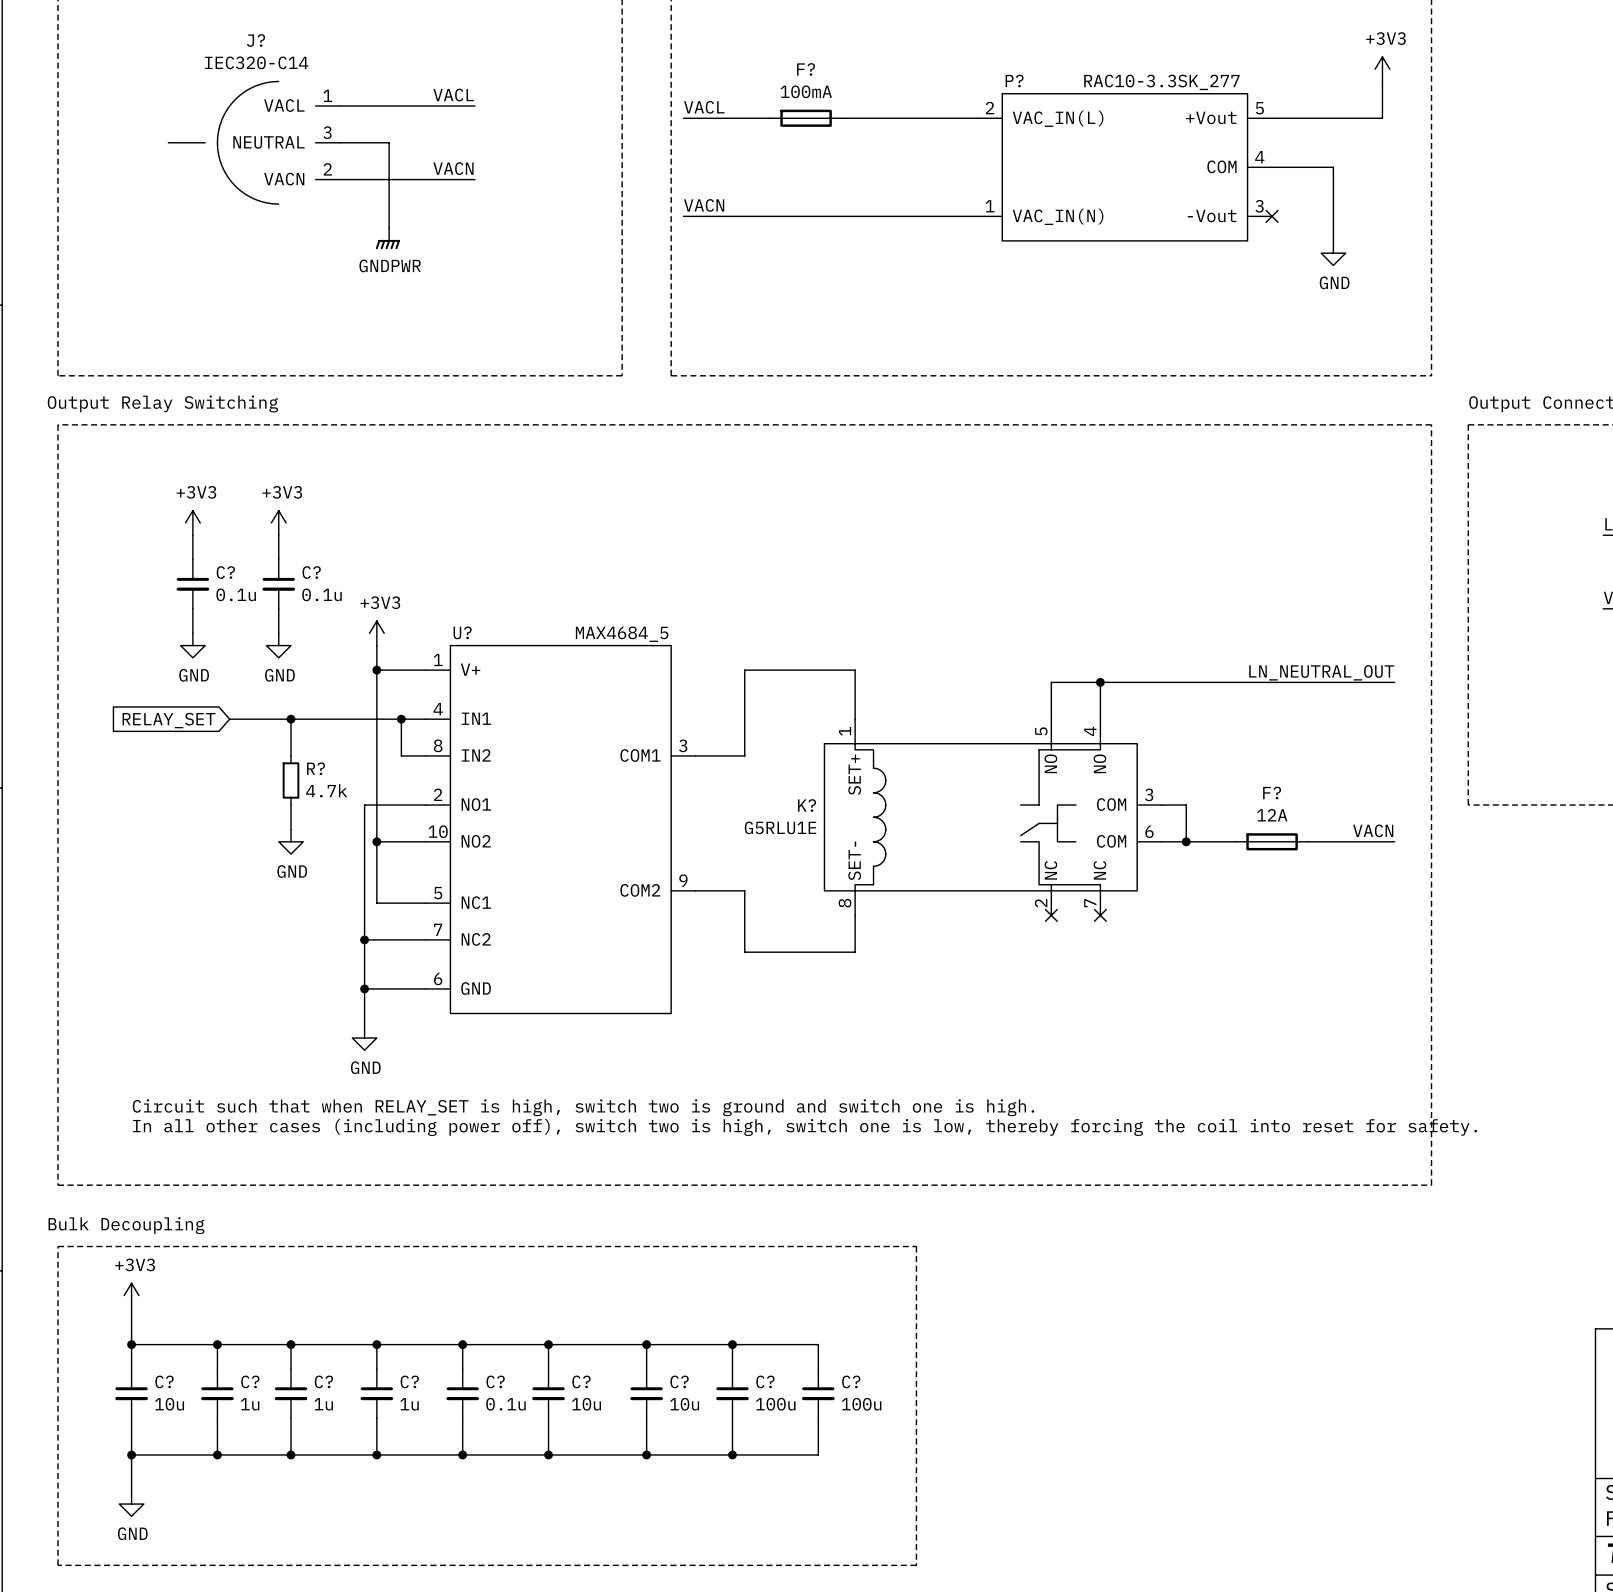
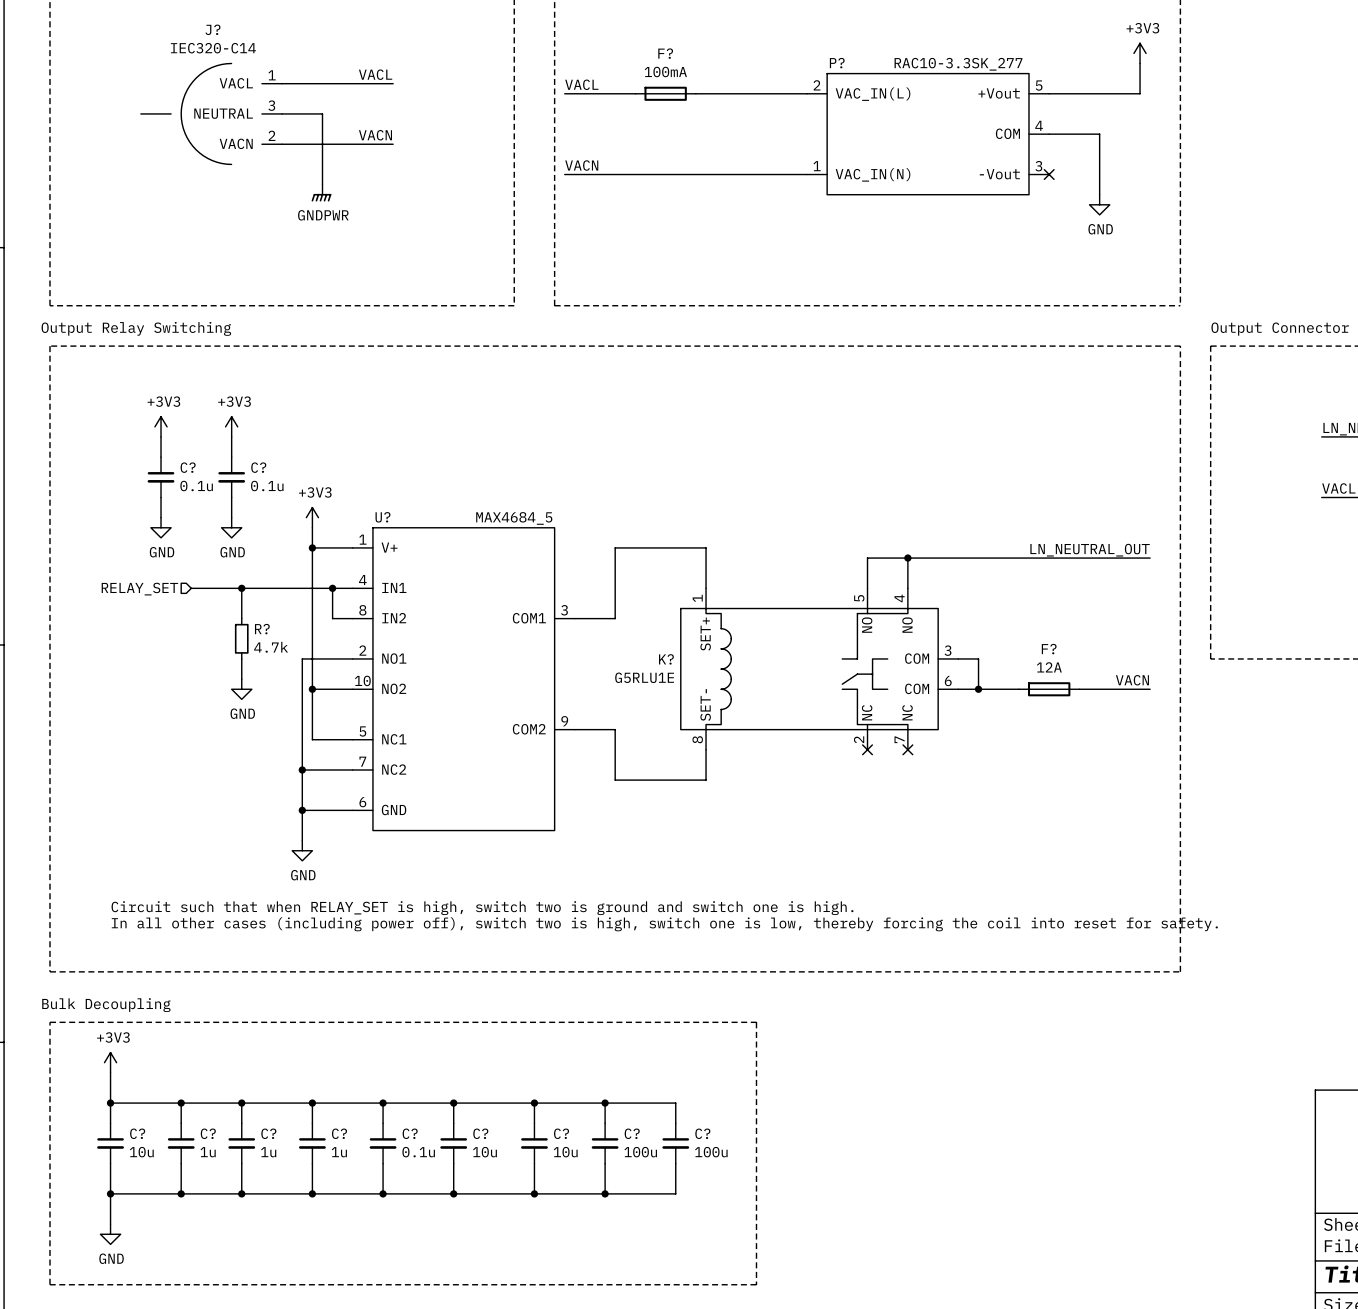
hierarchical label: none -> RELAY_SET (139, 589)
global label: RELAY_SET (169, 720) -> none

